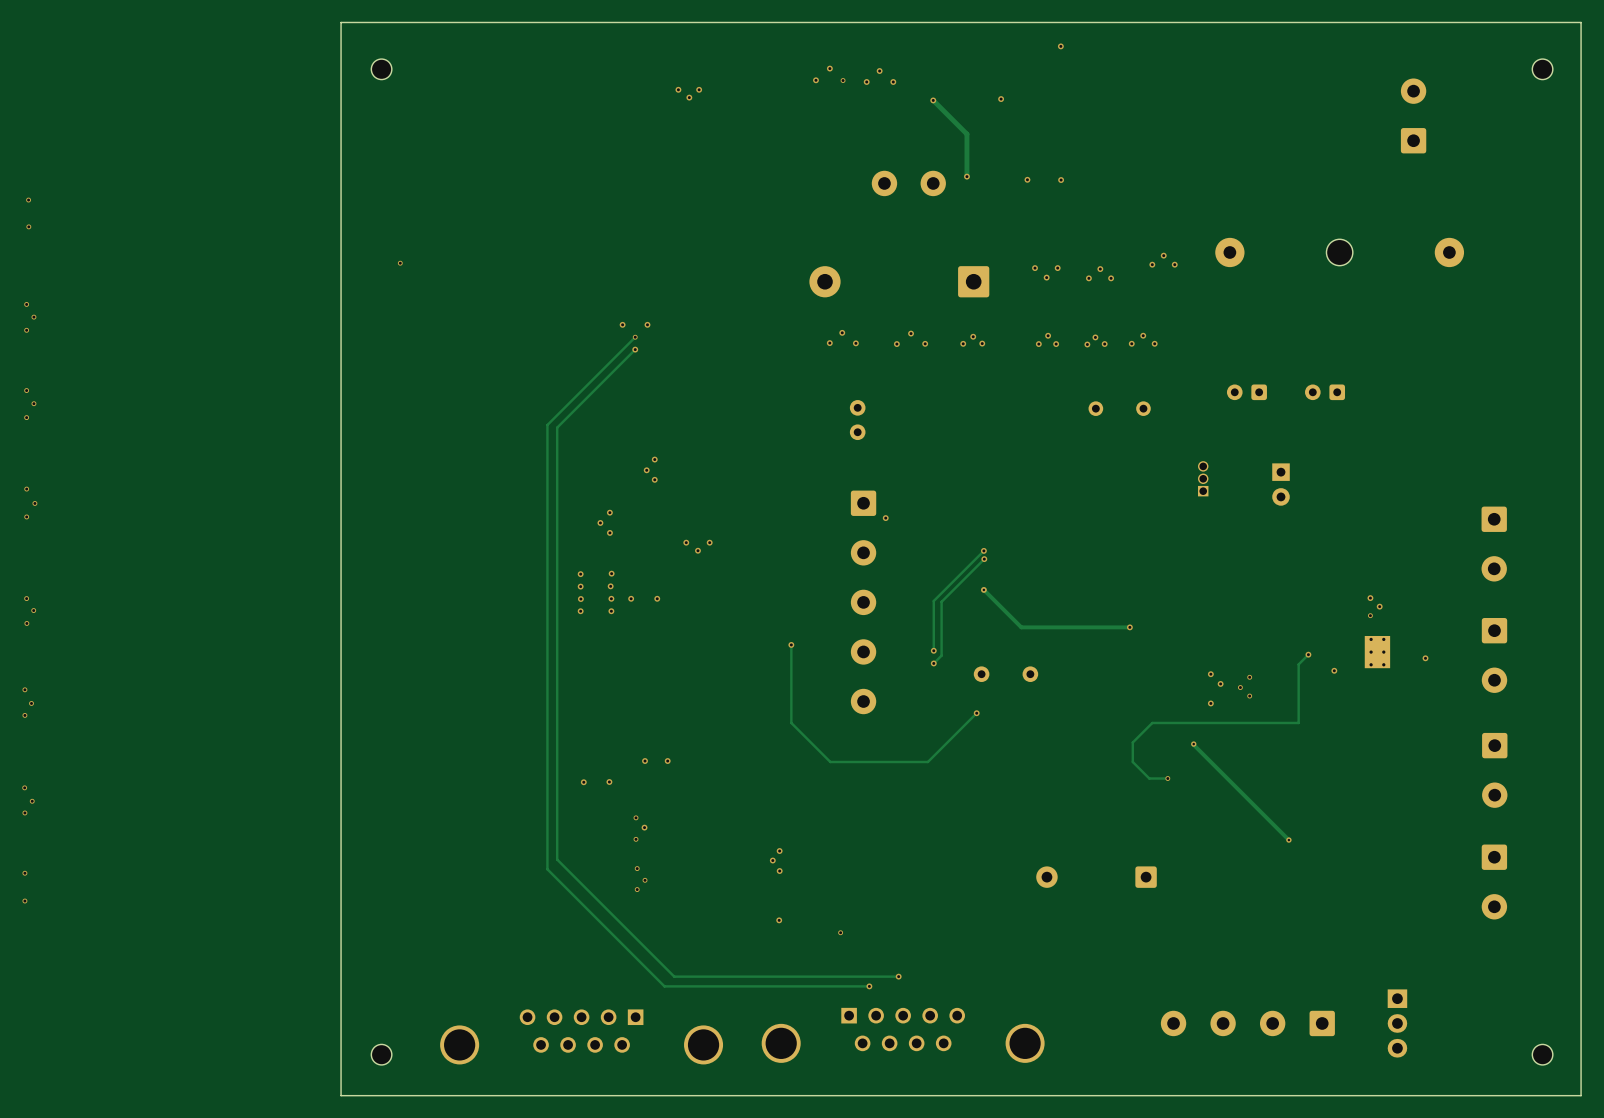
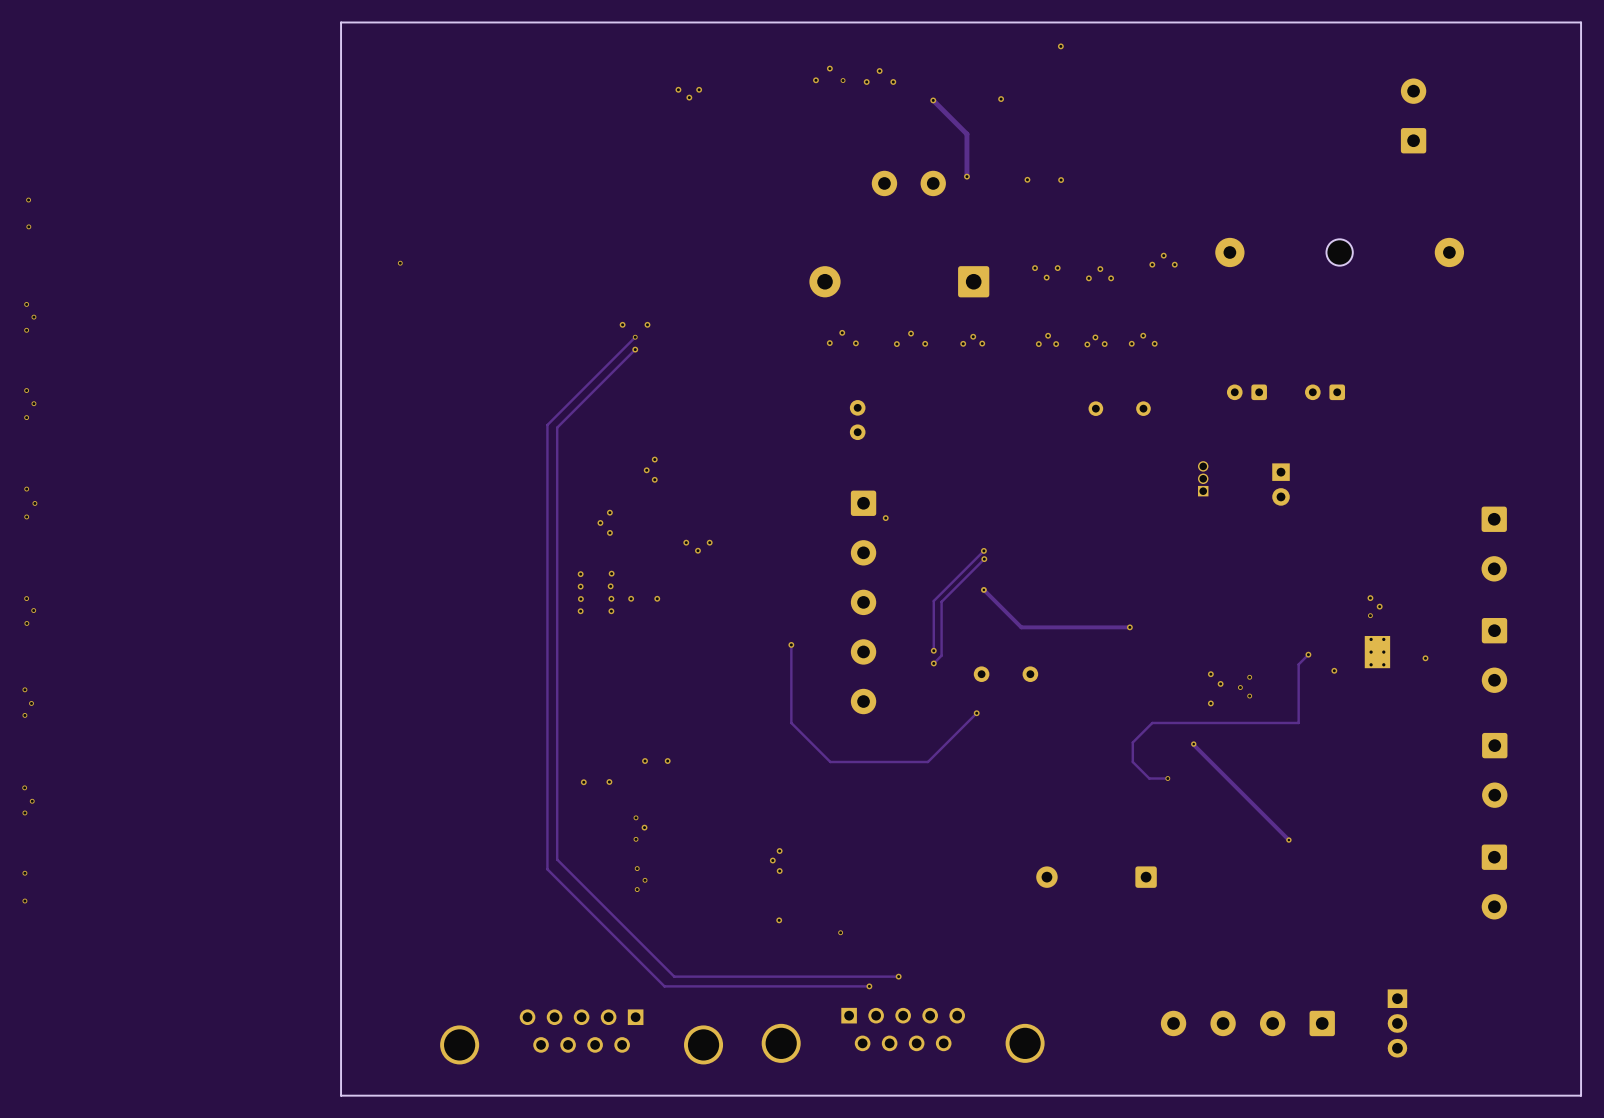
part: (381, 69) -> none
part: (1542, 69) -> none
part: (381, 1054) -> none
part: (1542, 1054) -> none

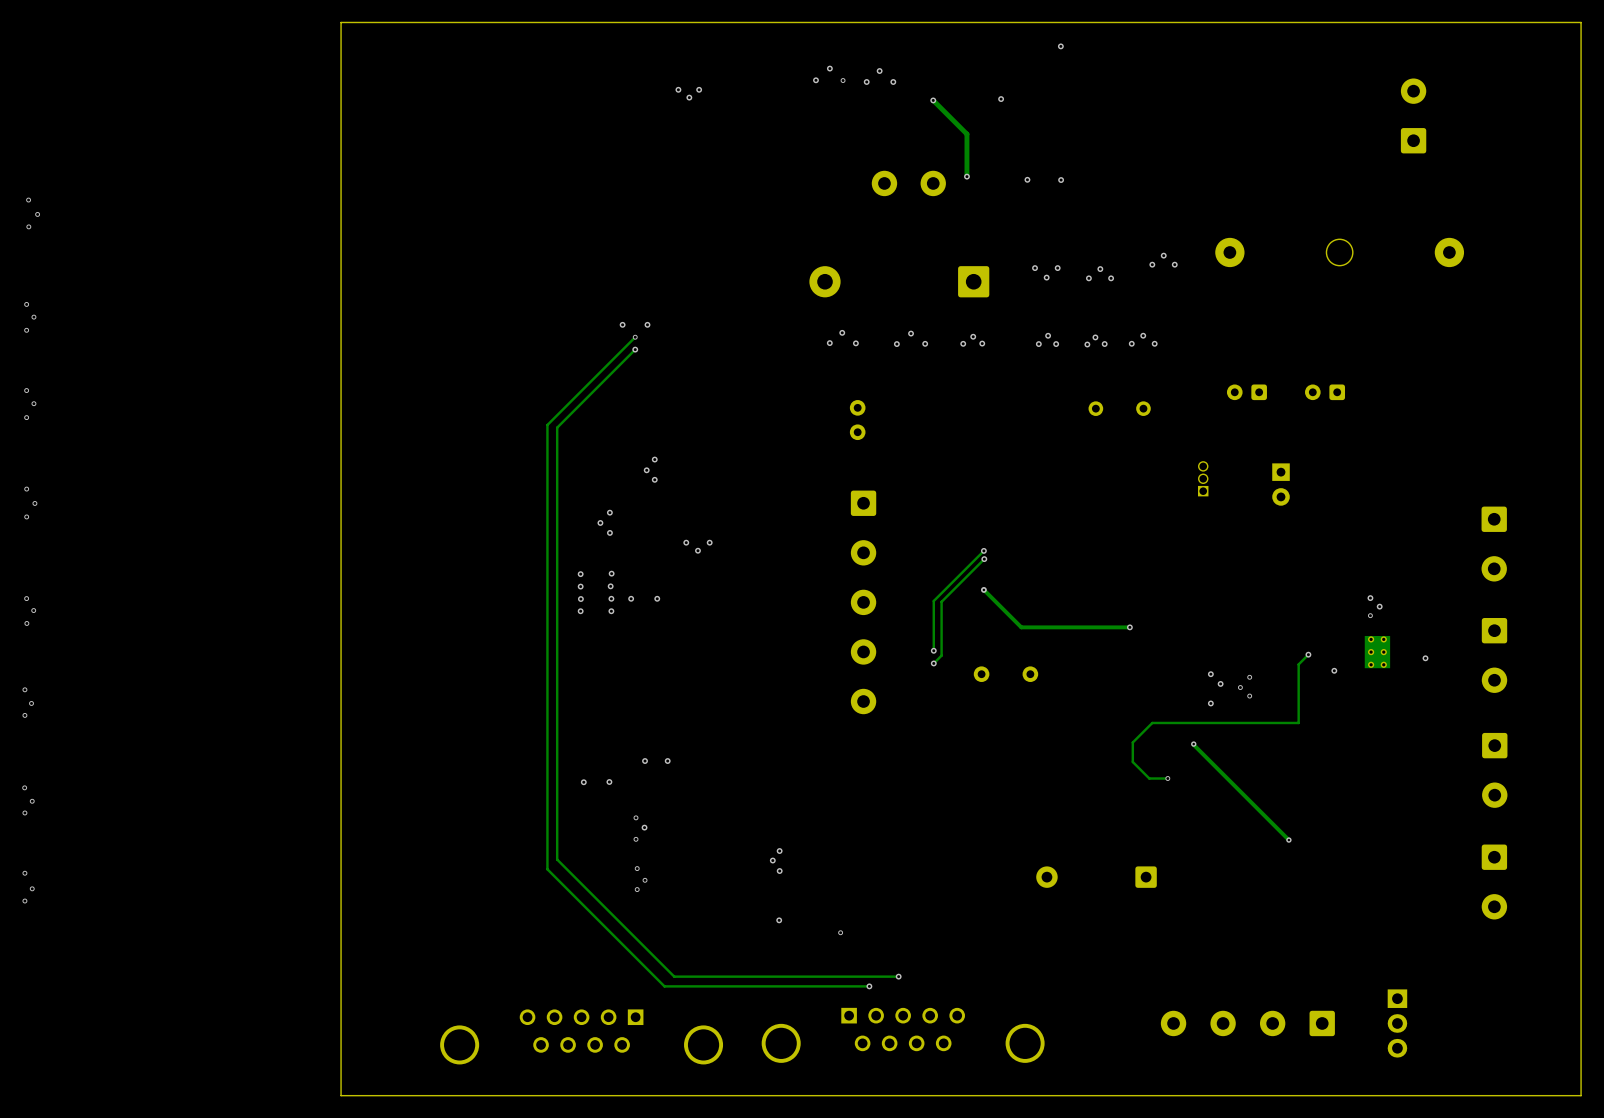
via: none -> (37, 214)
via: (400, 263) -> none
via: (885, 518) -> none
track: (791, 644) (791, 722) (830, 762) (927, 762) (976, 713) -> none
via: (791, 644) -> none
via: (976, 713) -> none
via: none -> (32, 888)

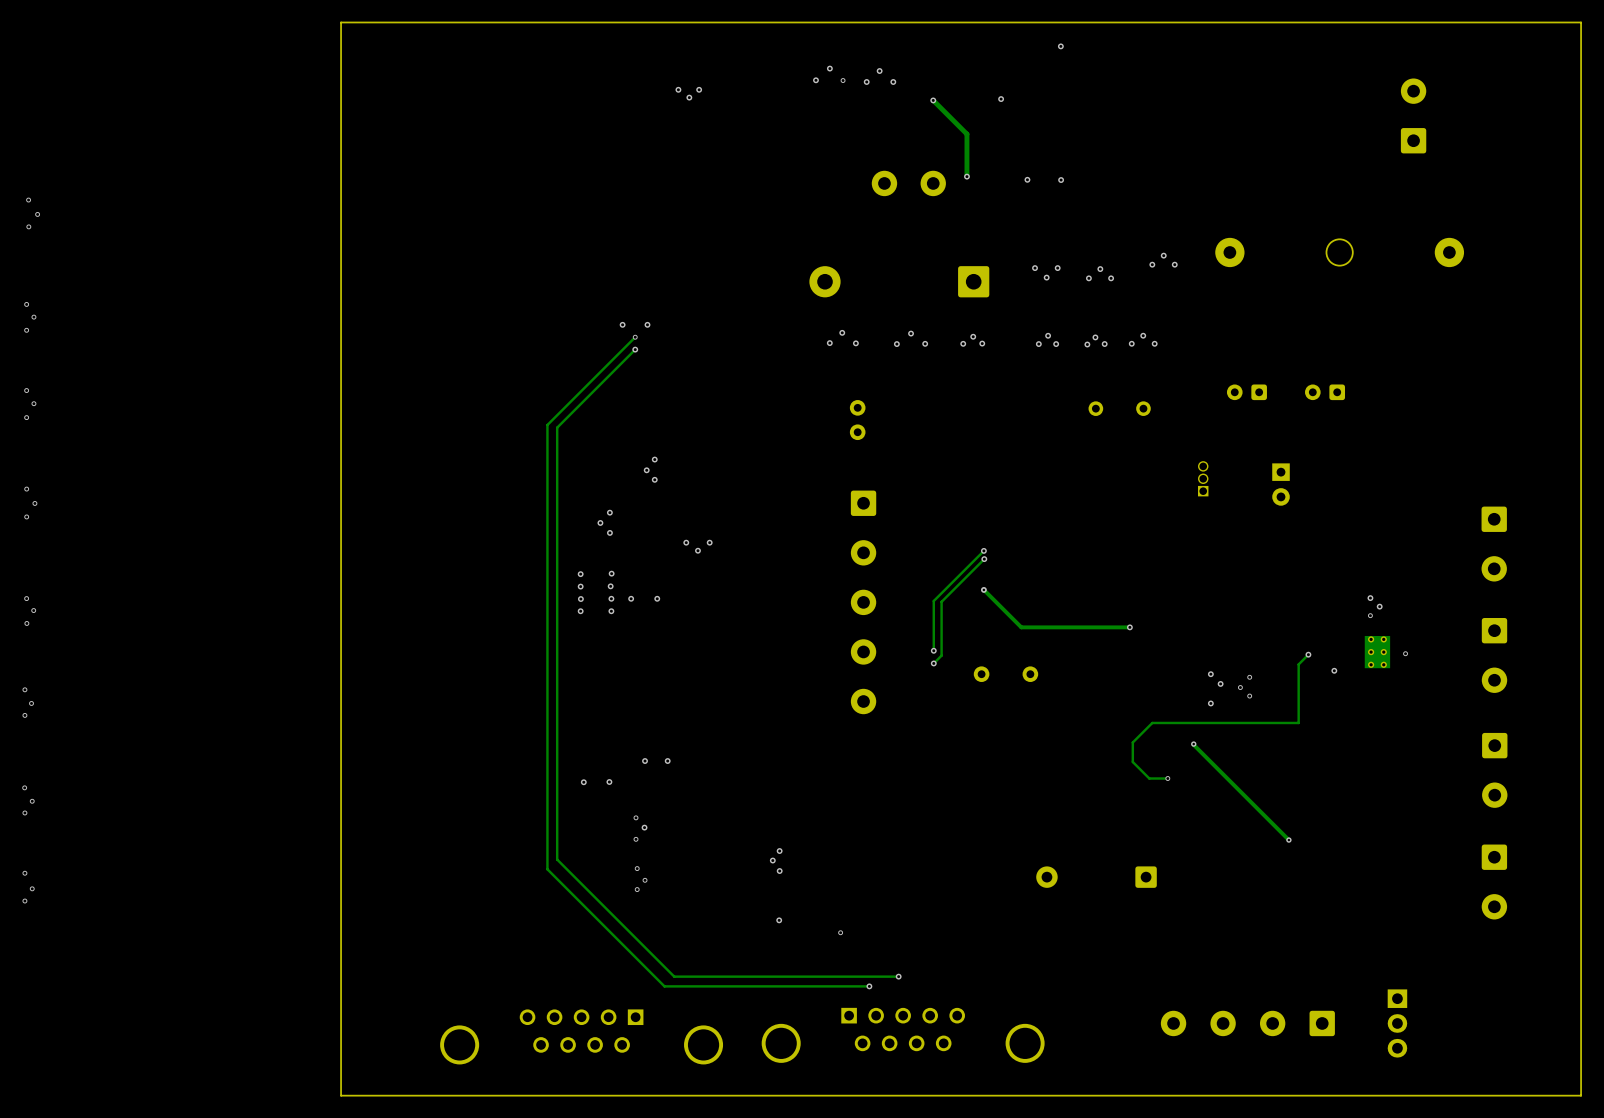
via: none -> (1405, 653)
via: (1425, 658) -> none

